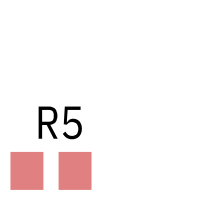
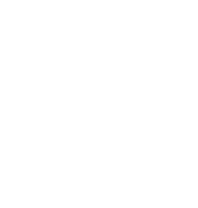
R5: (50, 170) -> none

